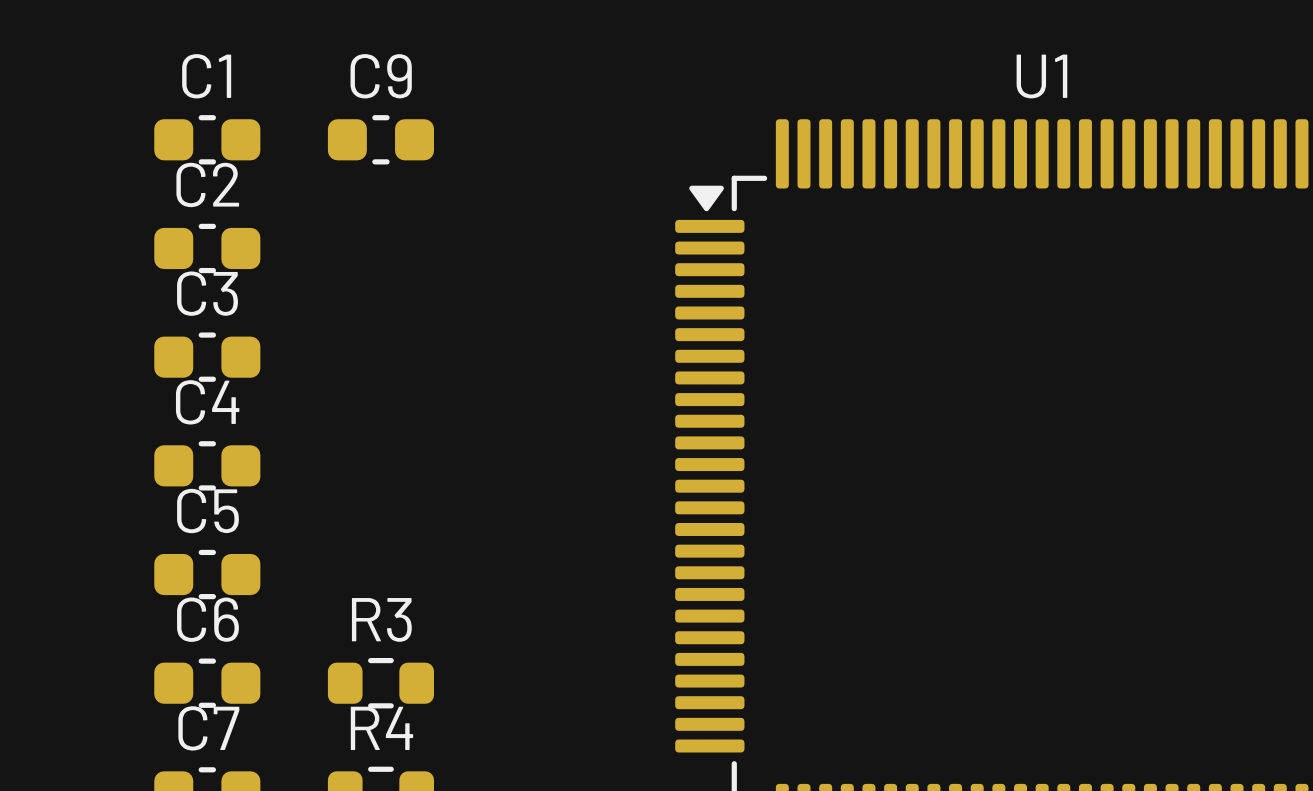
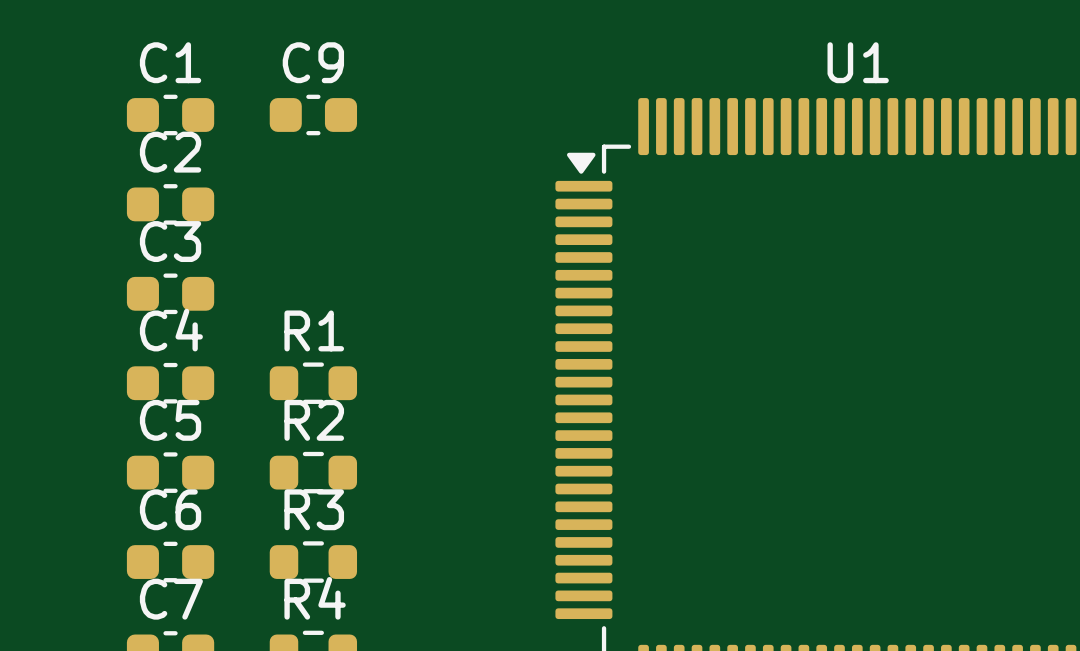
R1: none -> (313, 383)
R2: none -> (313, 472)

